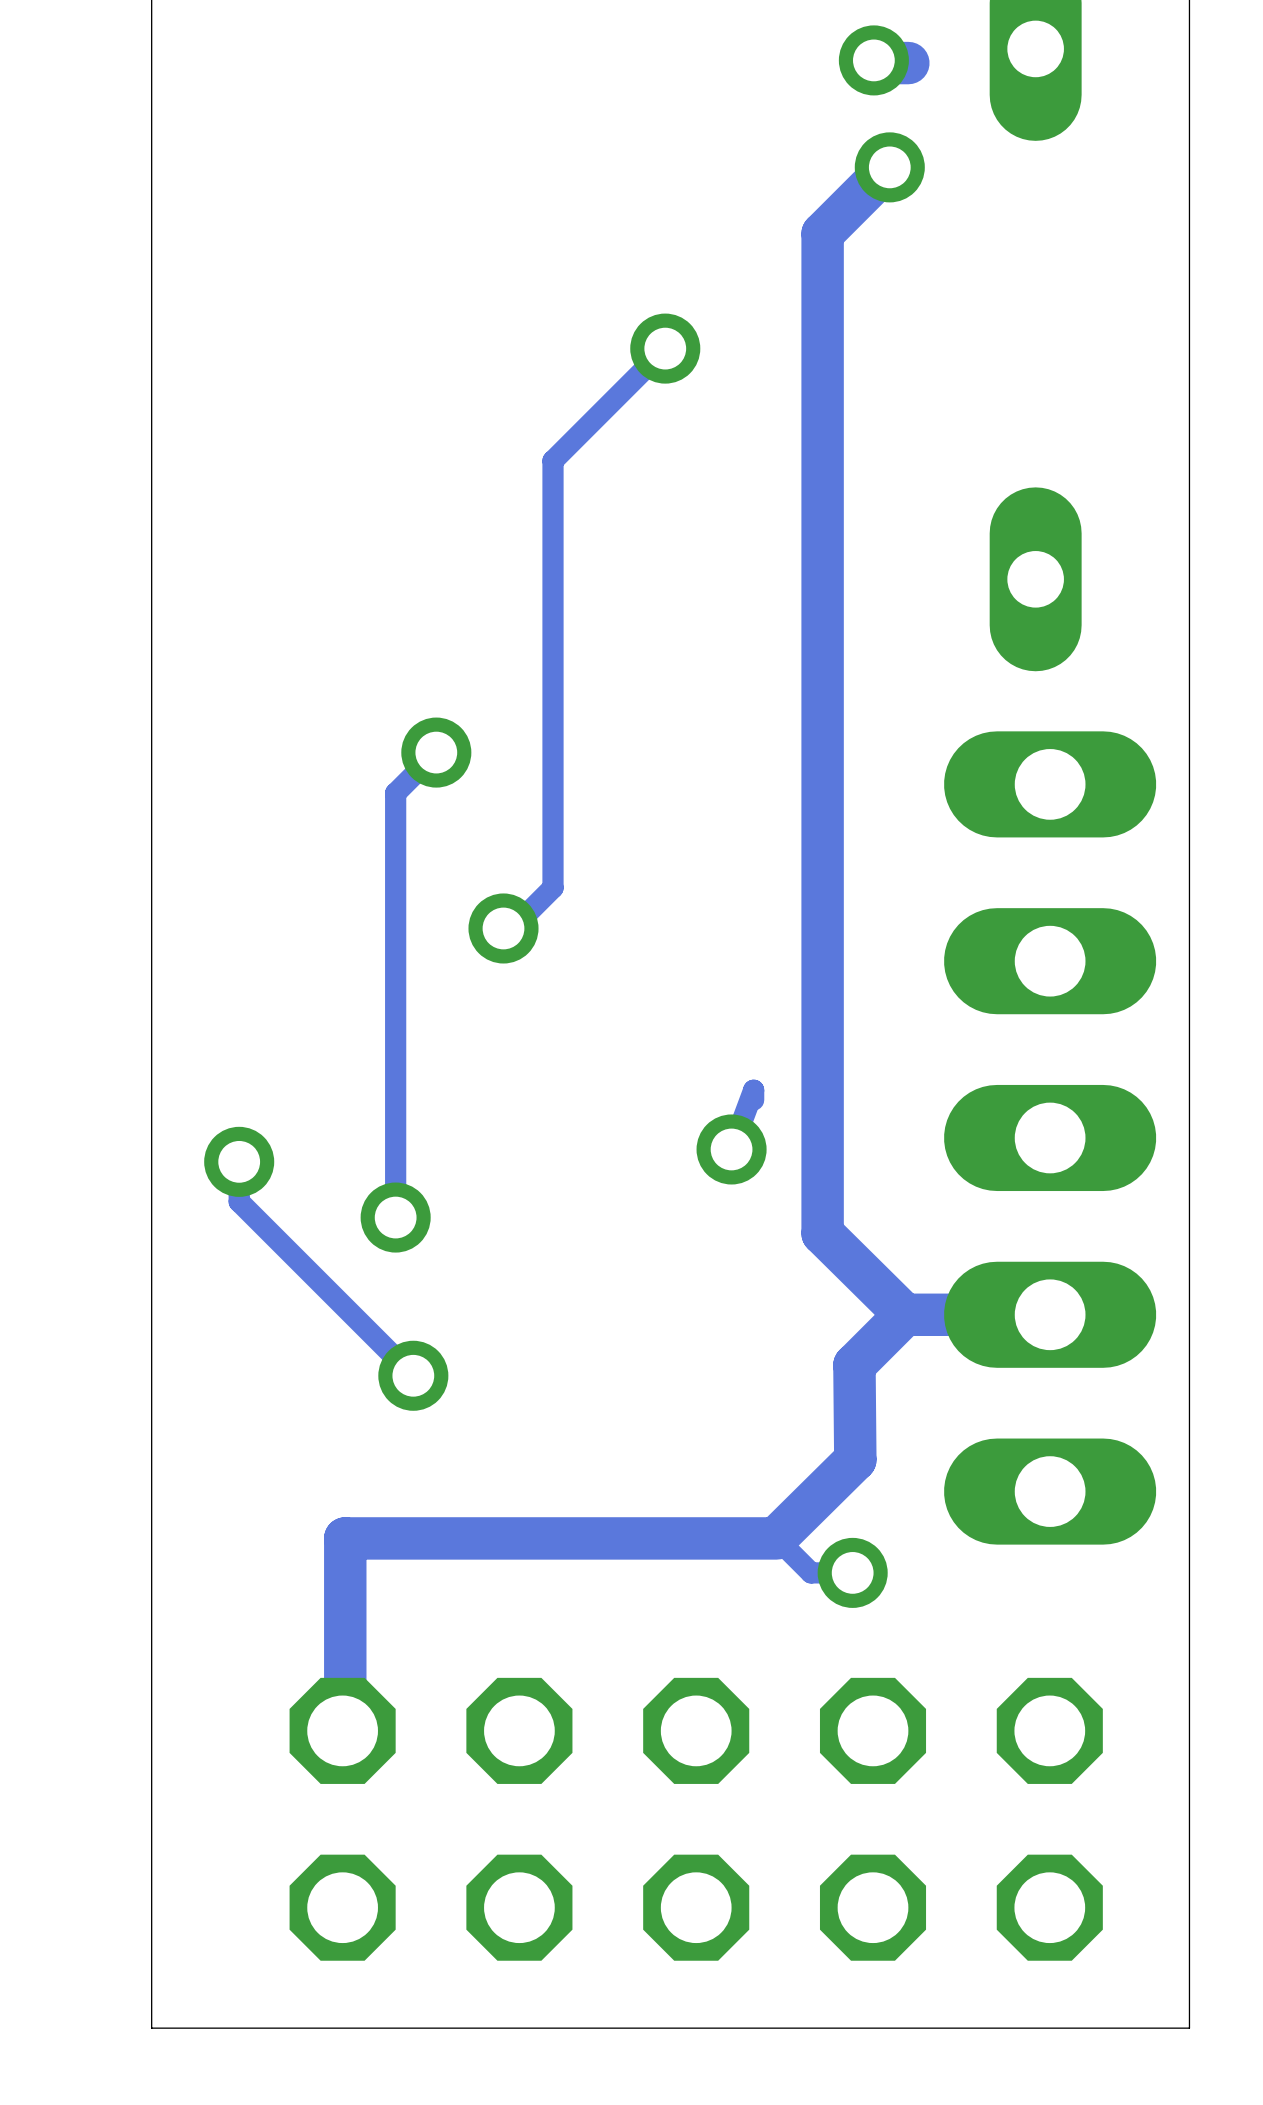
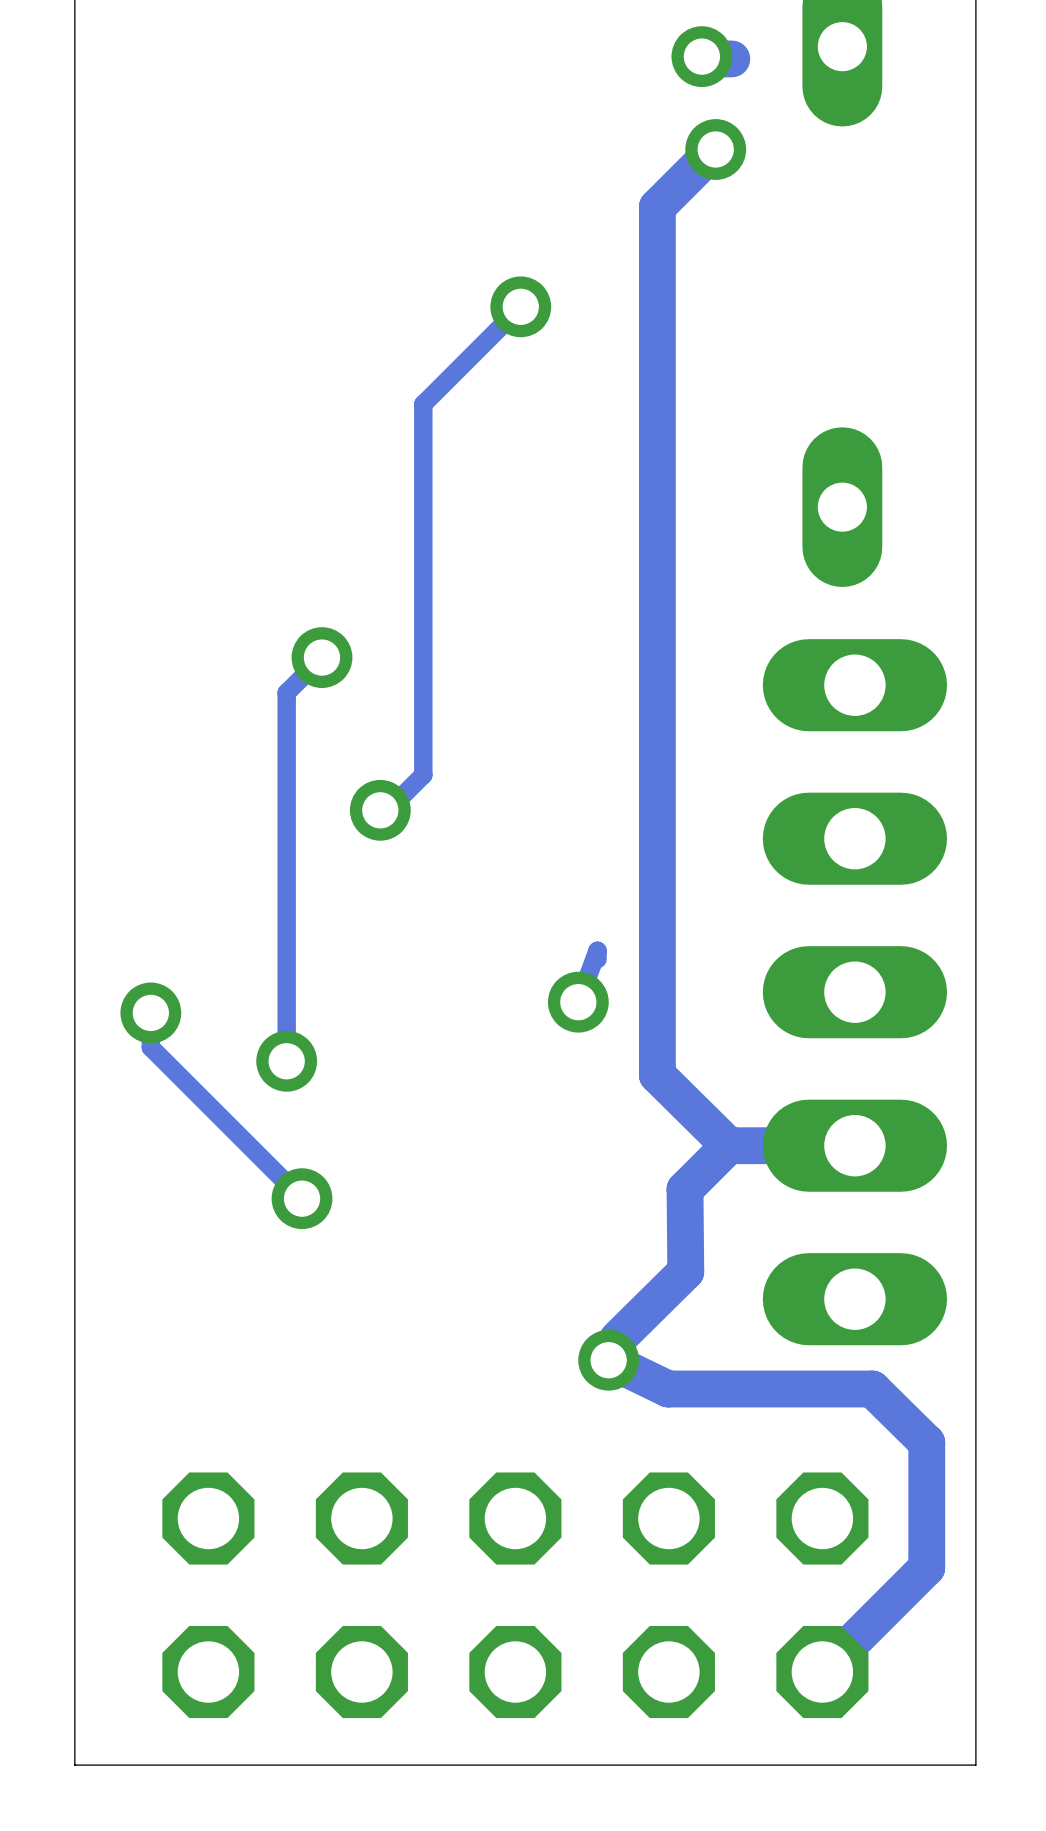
track: none -> (608, 1360) (668, 1389) (872, 1389) (926, 1442) (926, 1567) (822, 1672)
track: (852, 1572) (811, 1572) (776, 1538) (345, 1538) (345, 1730) (342, 1730) -> none
via position: (852, 1572) -> (608, 1360)
part position: (696, 1819) -> (515, 1595)

